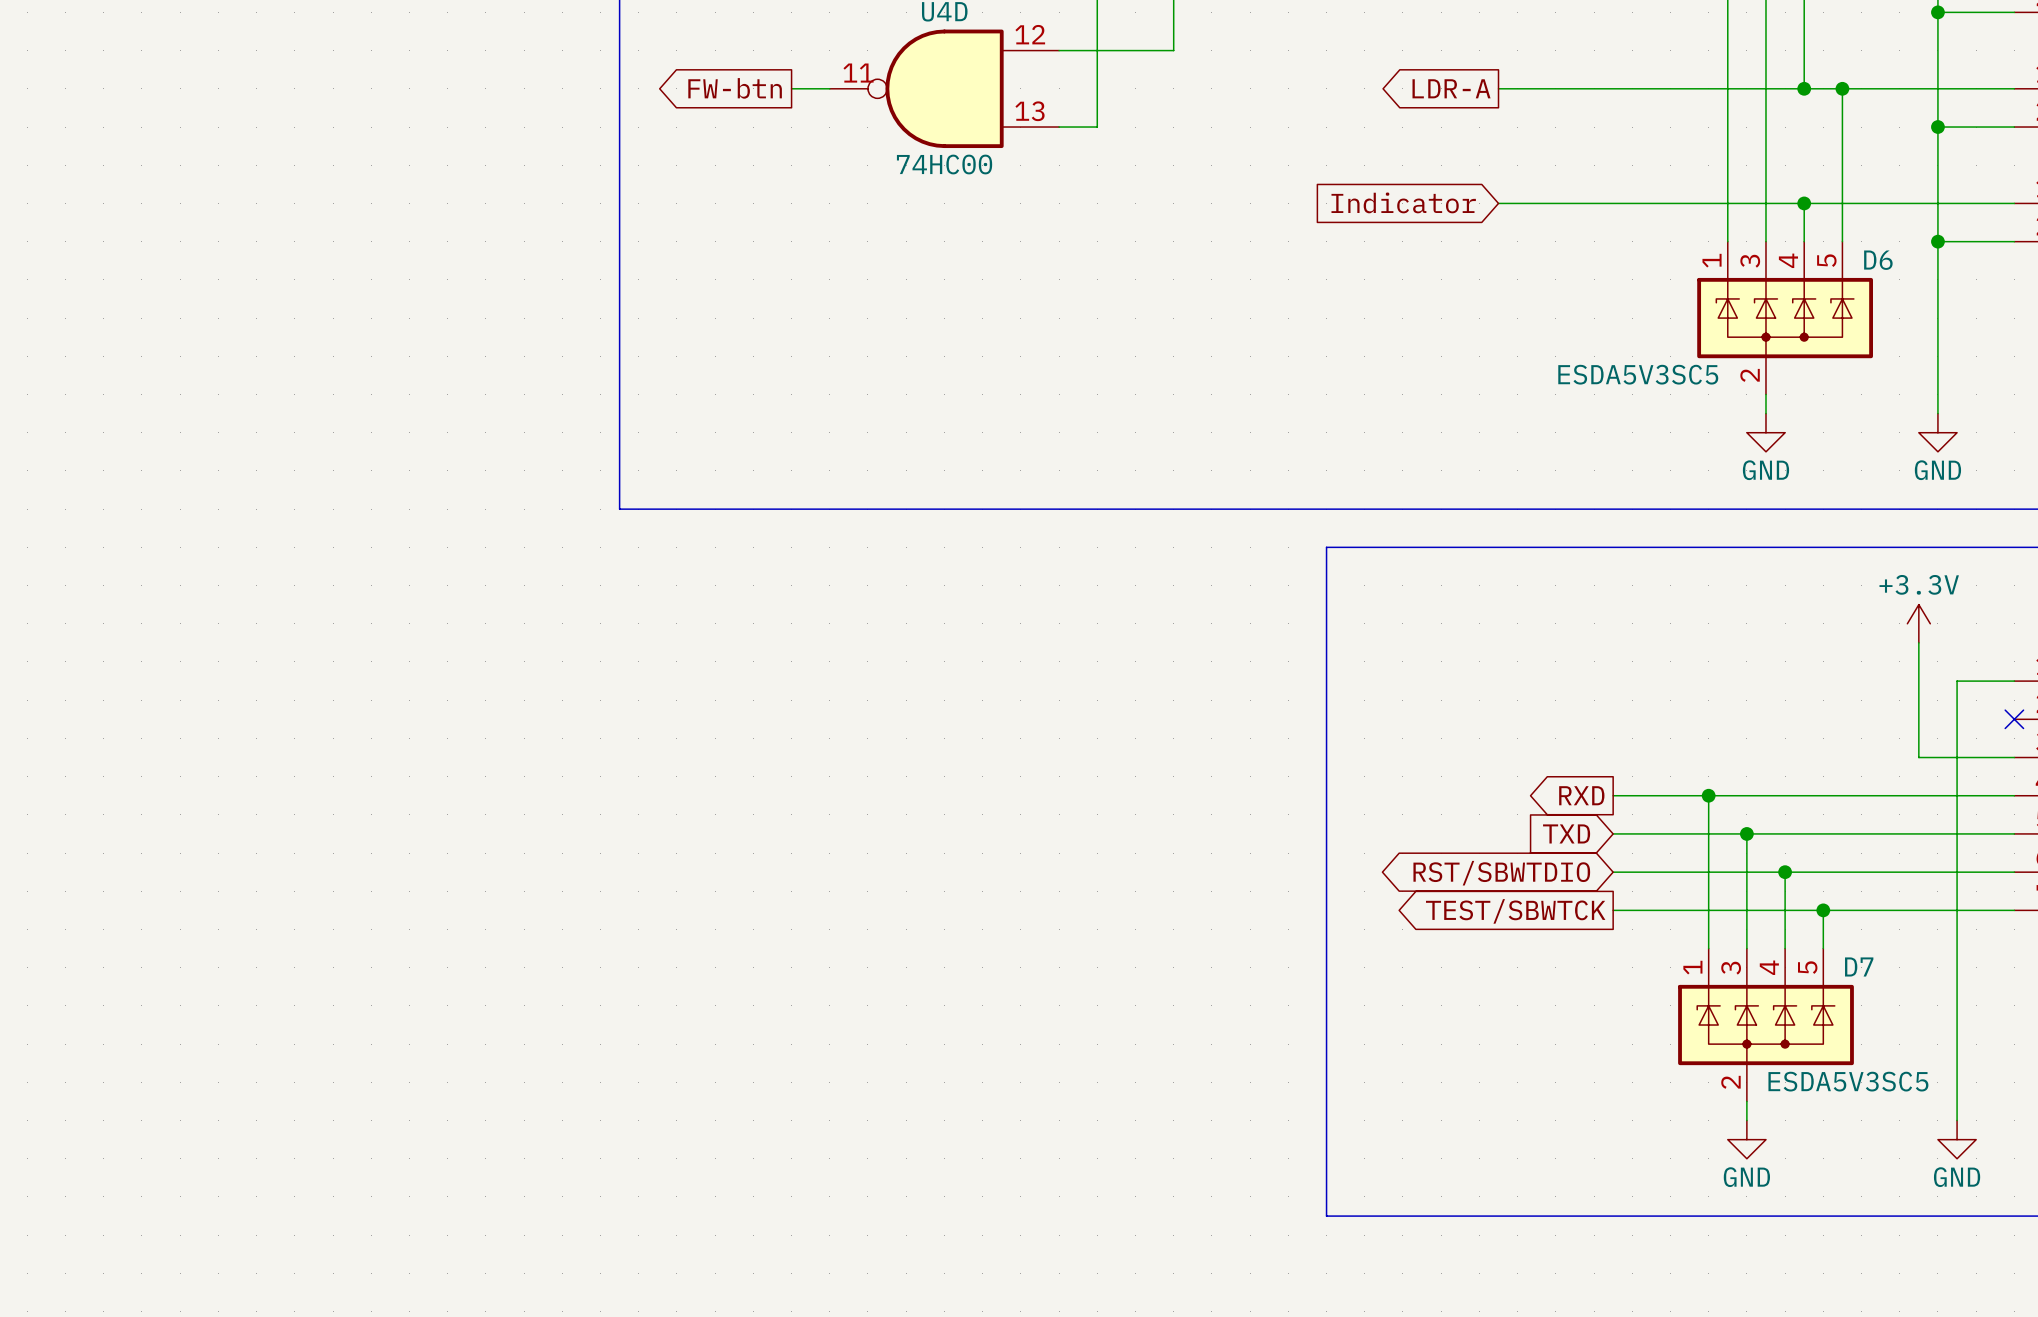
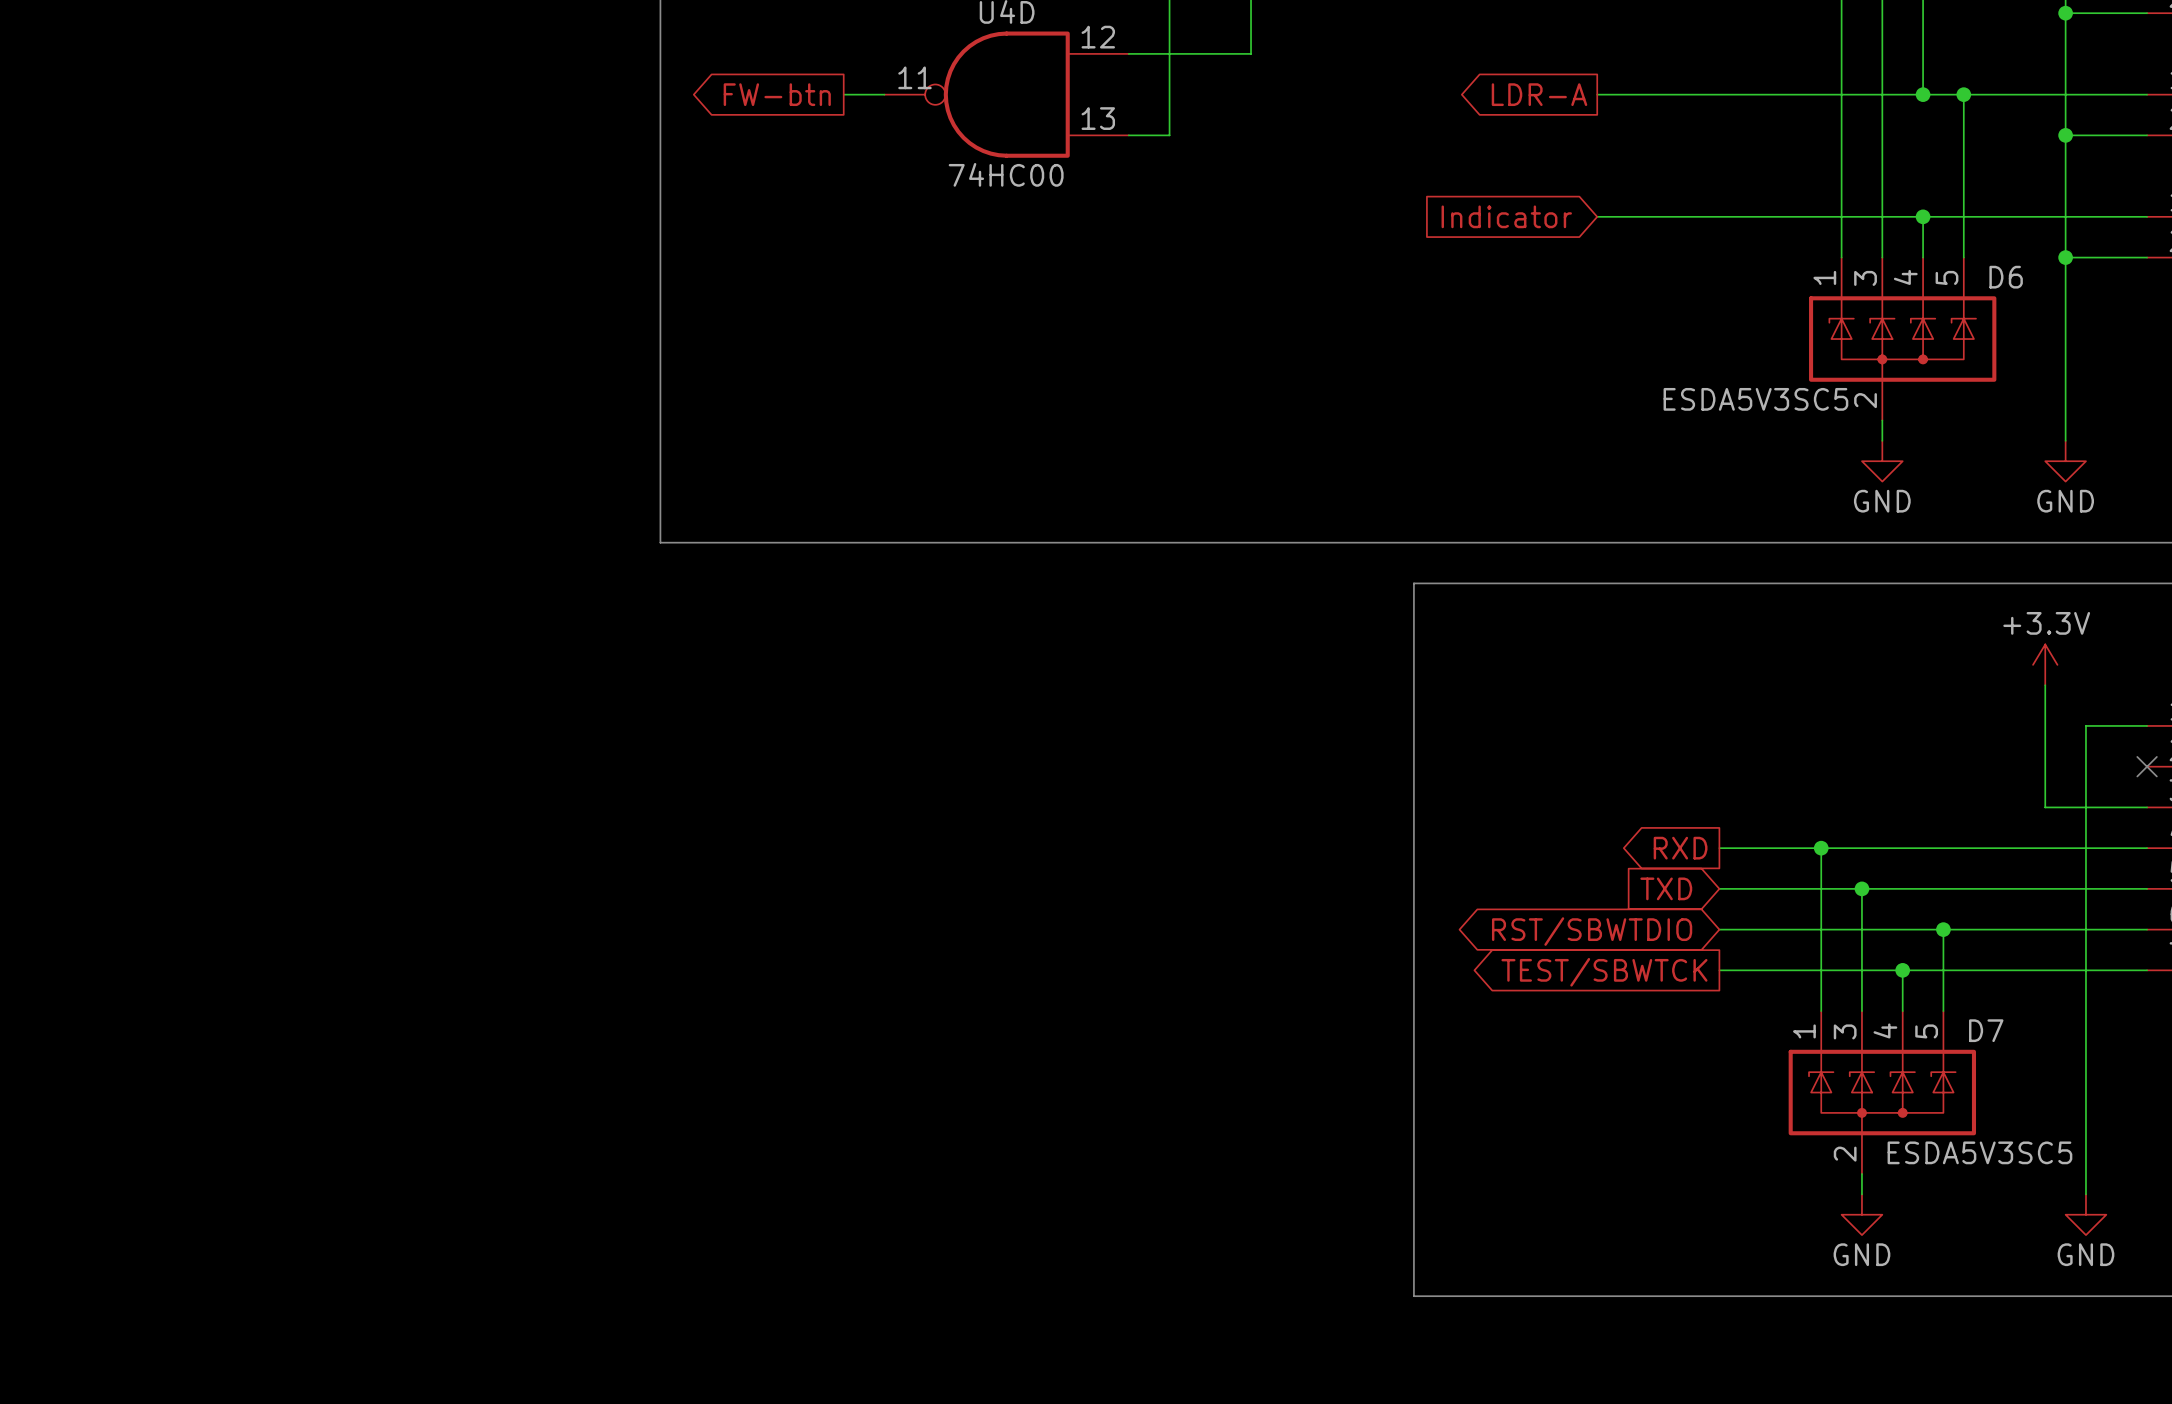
wire: (1785, 872) (1785, 910) -> (1943, 929) (1943, 970)
junction: (1785, 872) -> none
junction: none -> (1943, 929)
junction: none -> (1902, 970)
junction: (1823, 910) -> none

